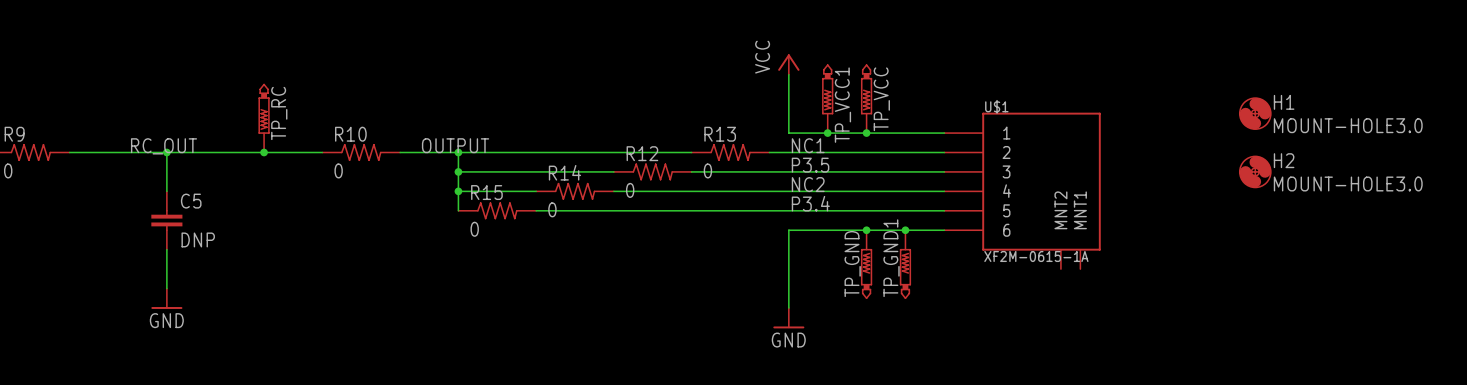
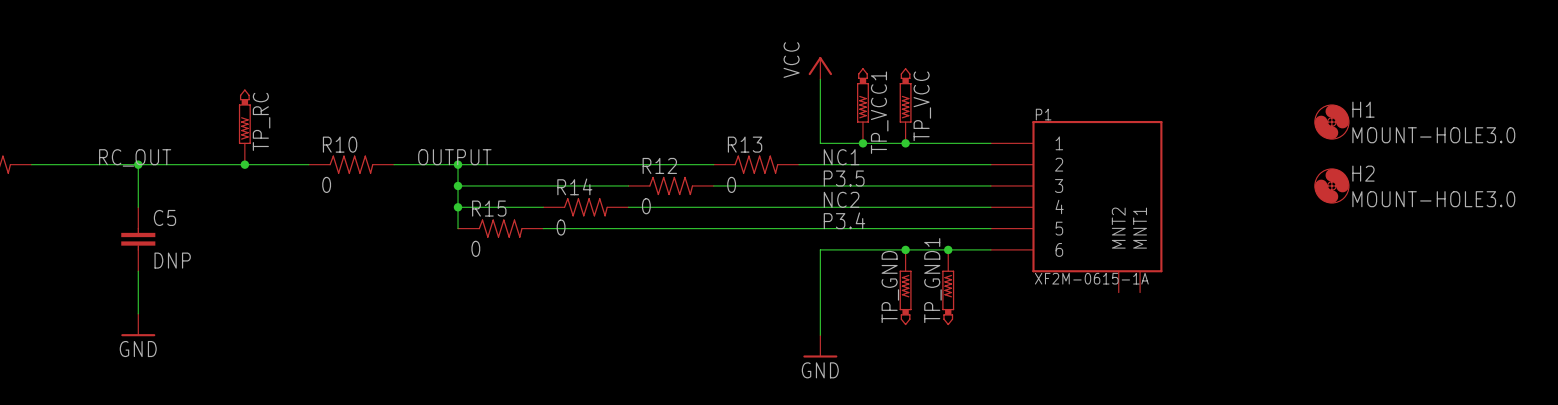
U$1 name: U$1 (996, 106) -> P1 (1043, 114)

